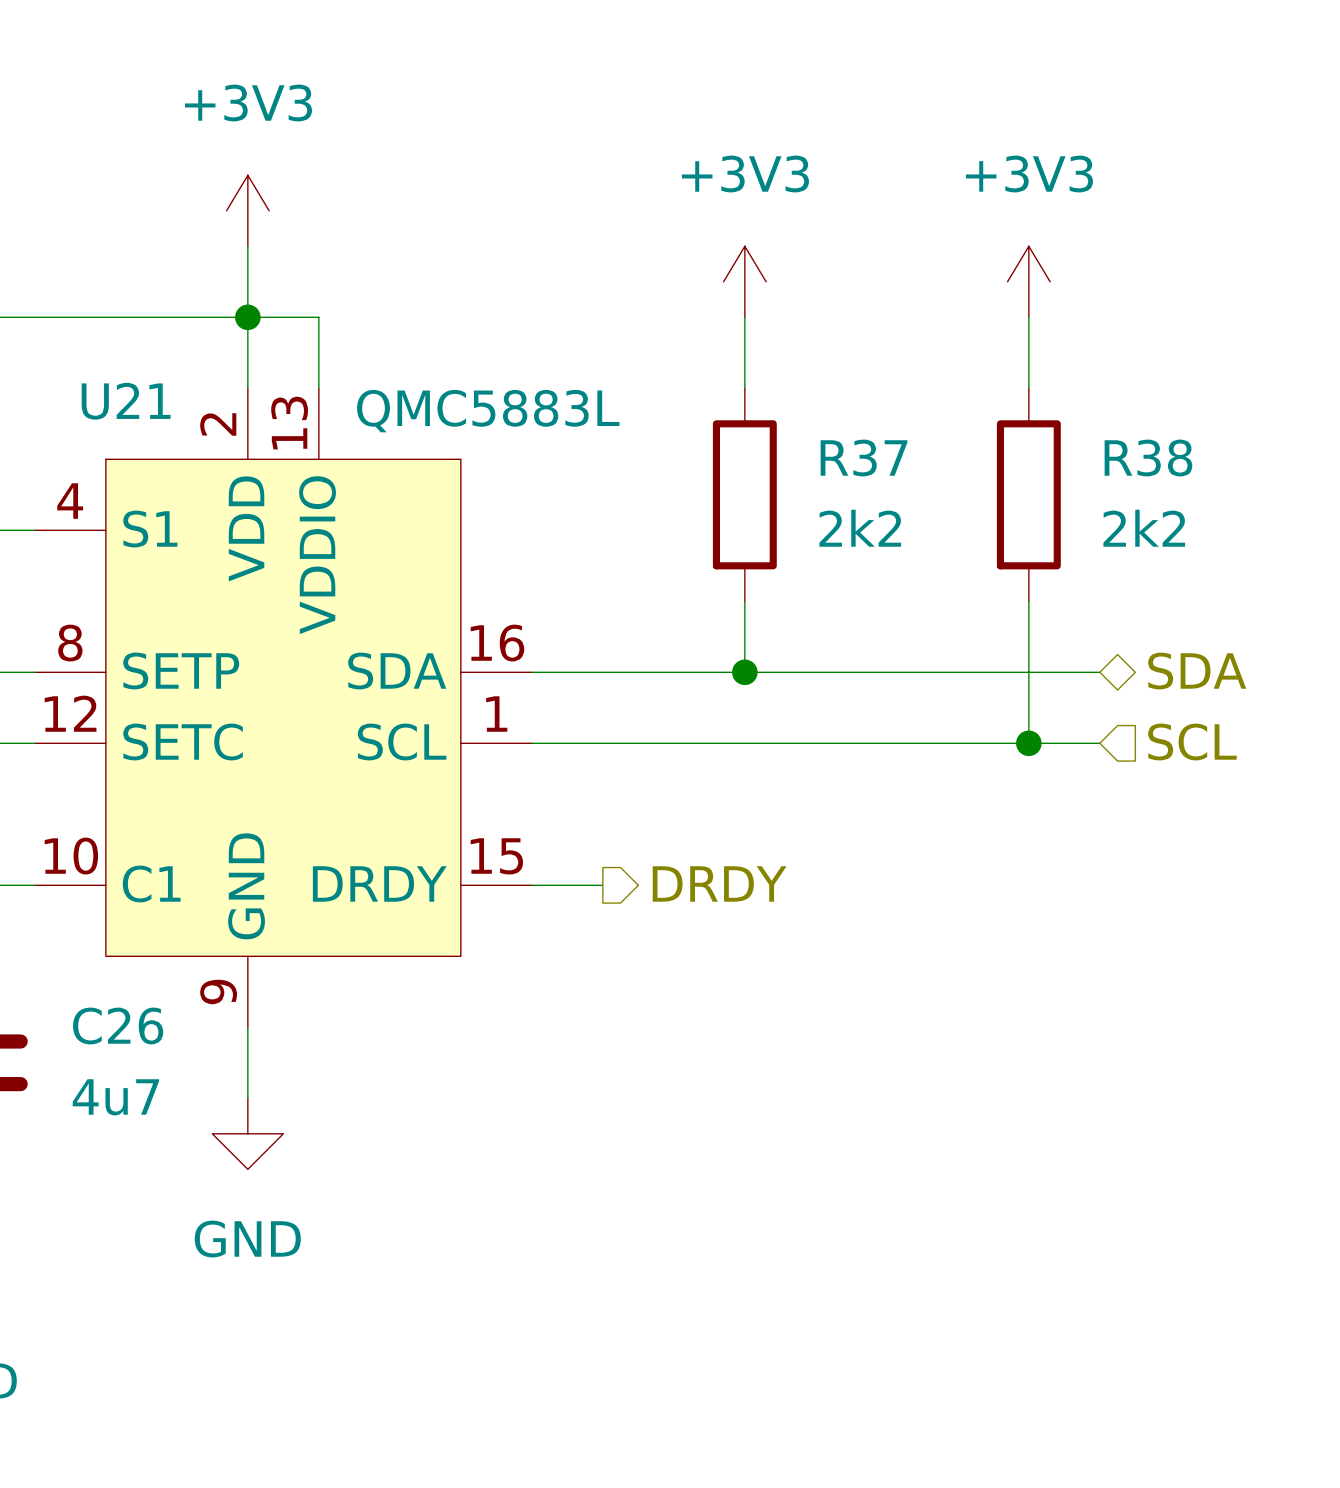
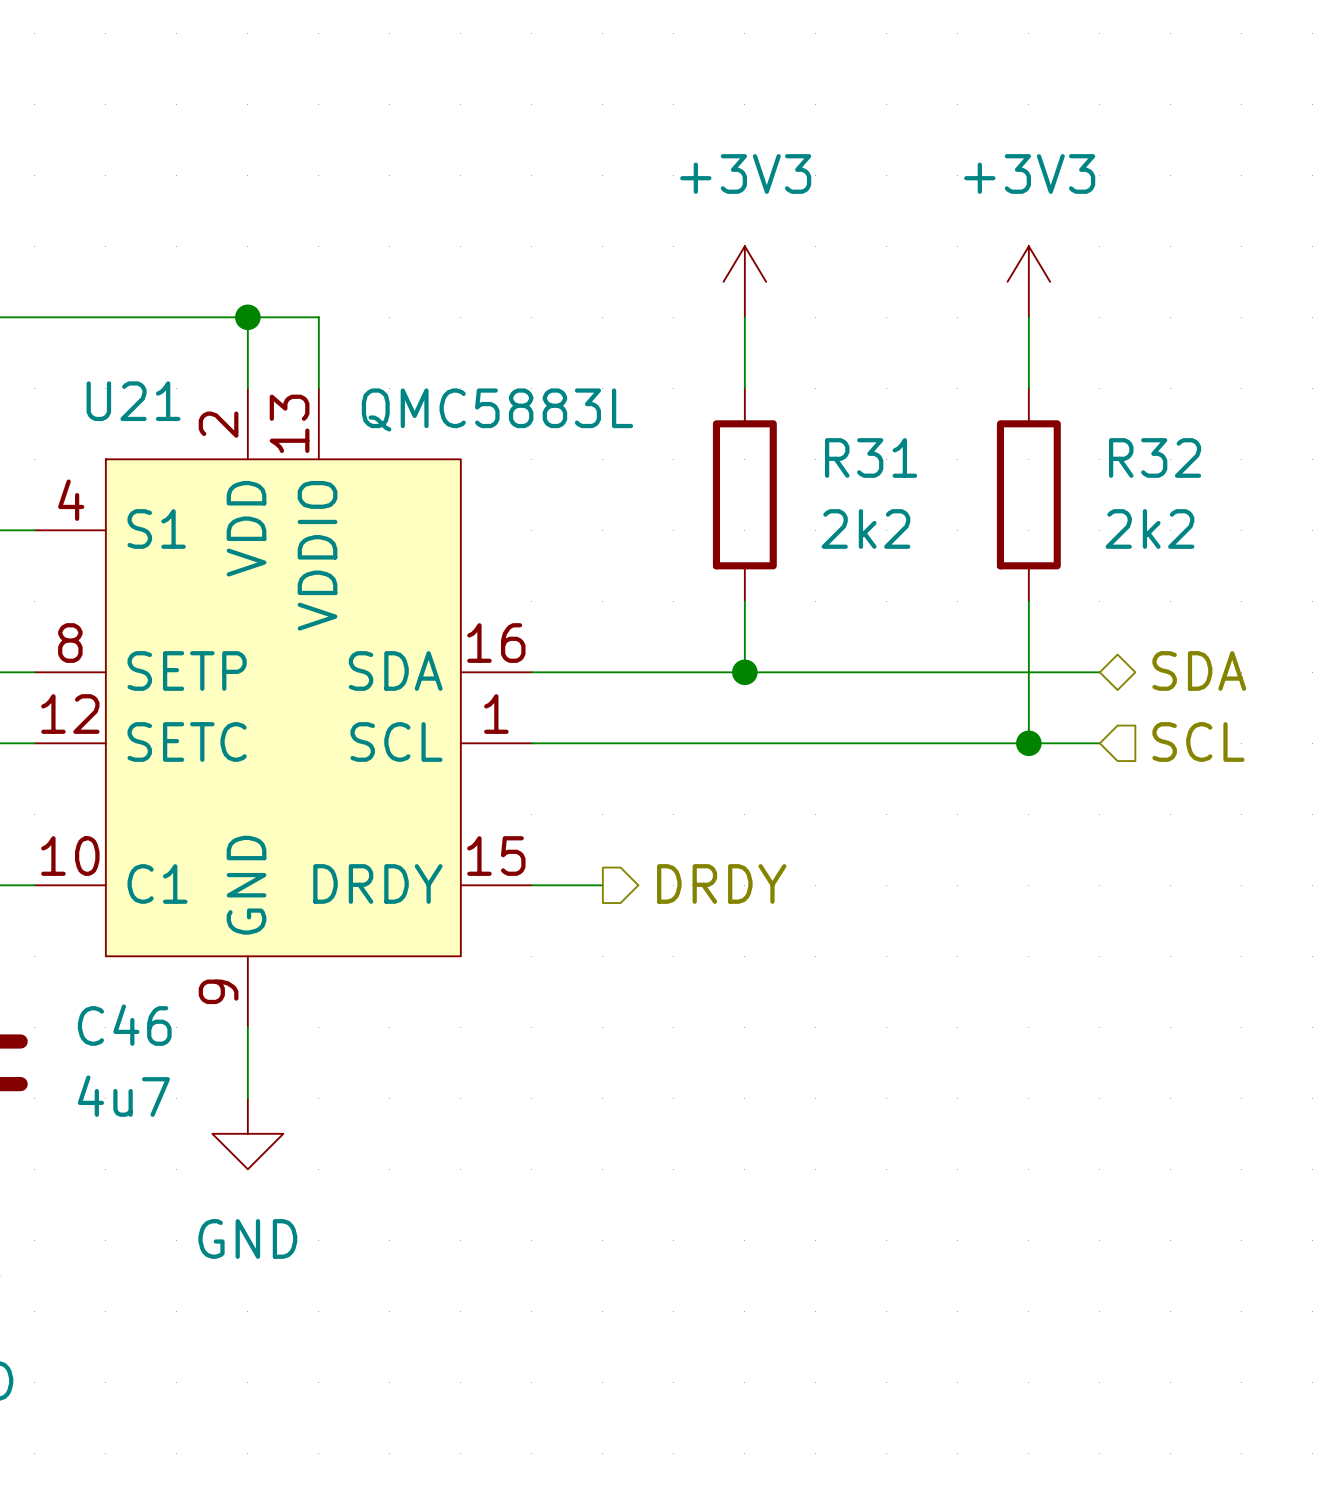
power symbol: +3V3 (247, 210) -> none
wire: (247, 246) (247, 317) -> none
R37 name: R37 (864, 458) -> R31 (871, 457)
R38 name: R38 (1148, 458) -> R32 (1155, 457)
C26 name: C26 (118, 1026) -> C46 (124, 1025)

